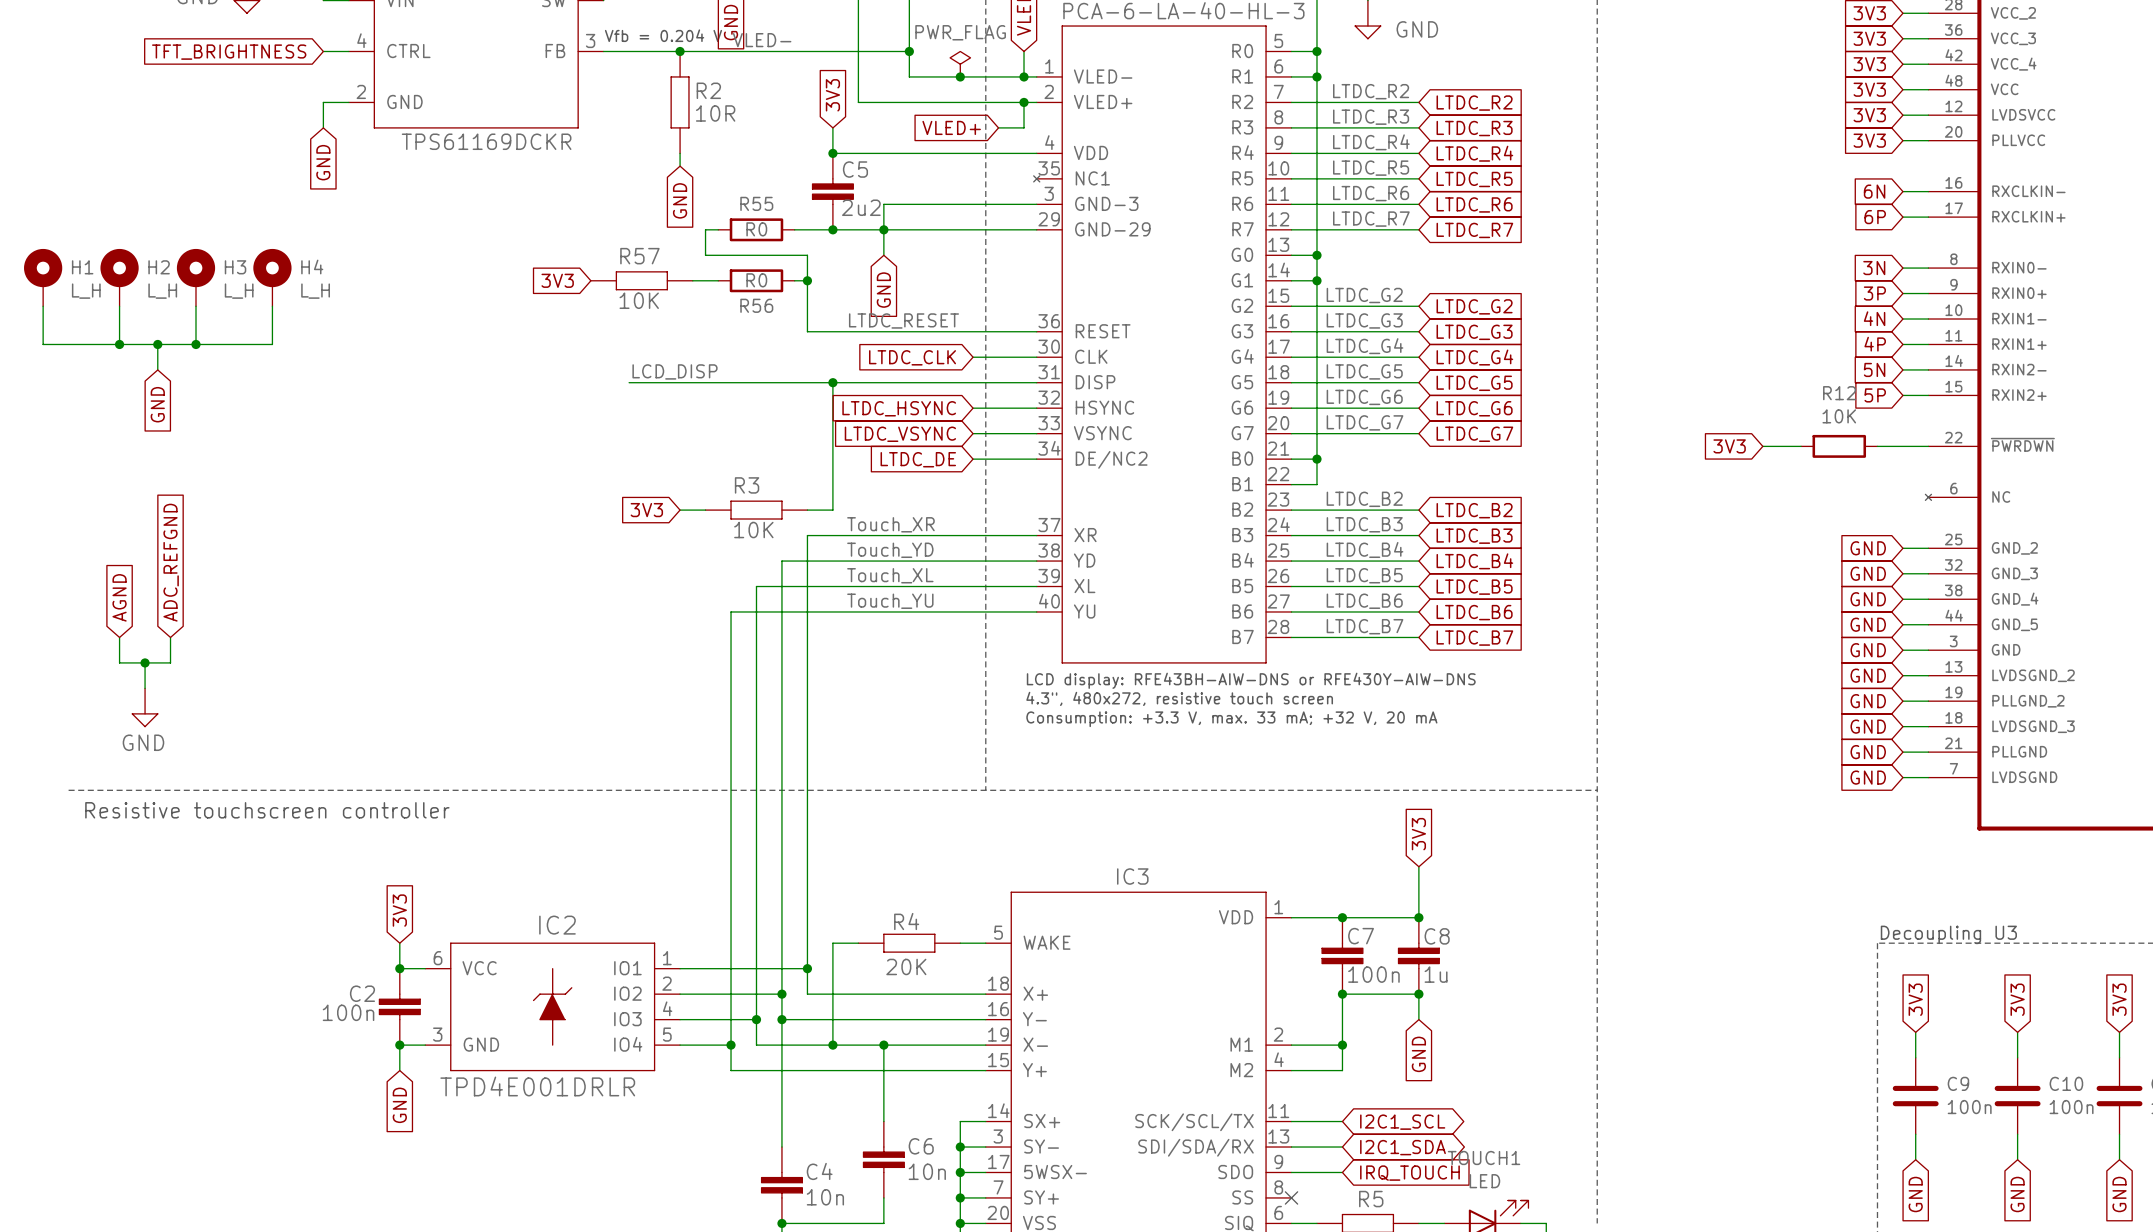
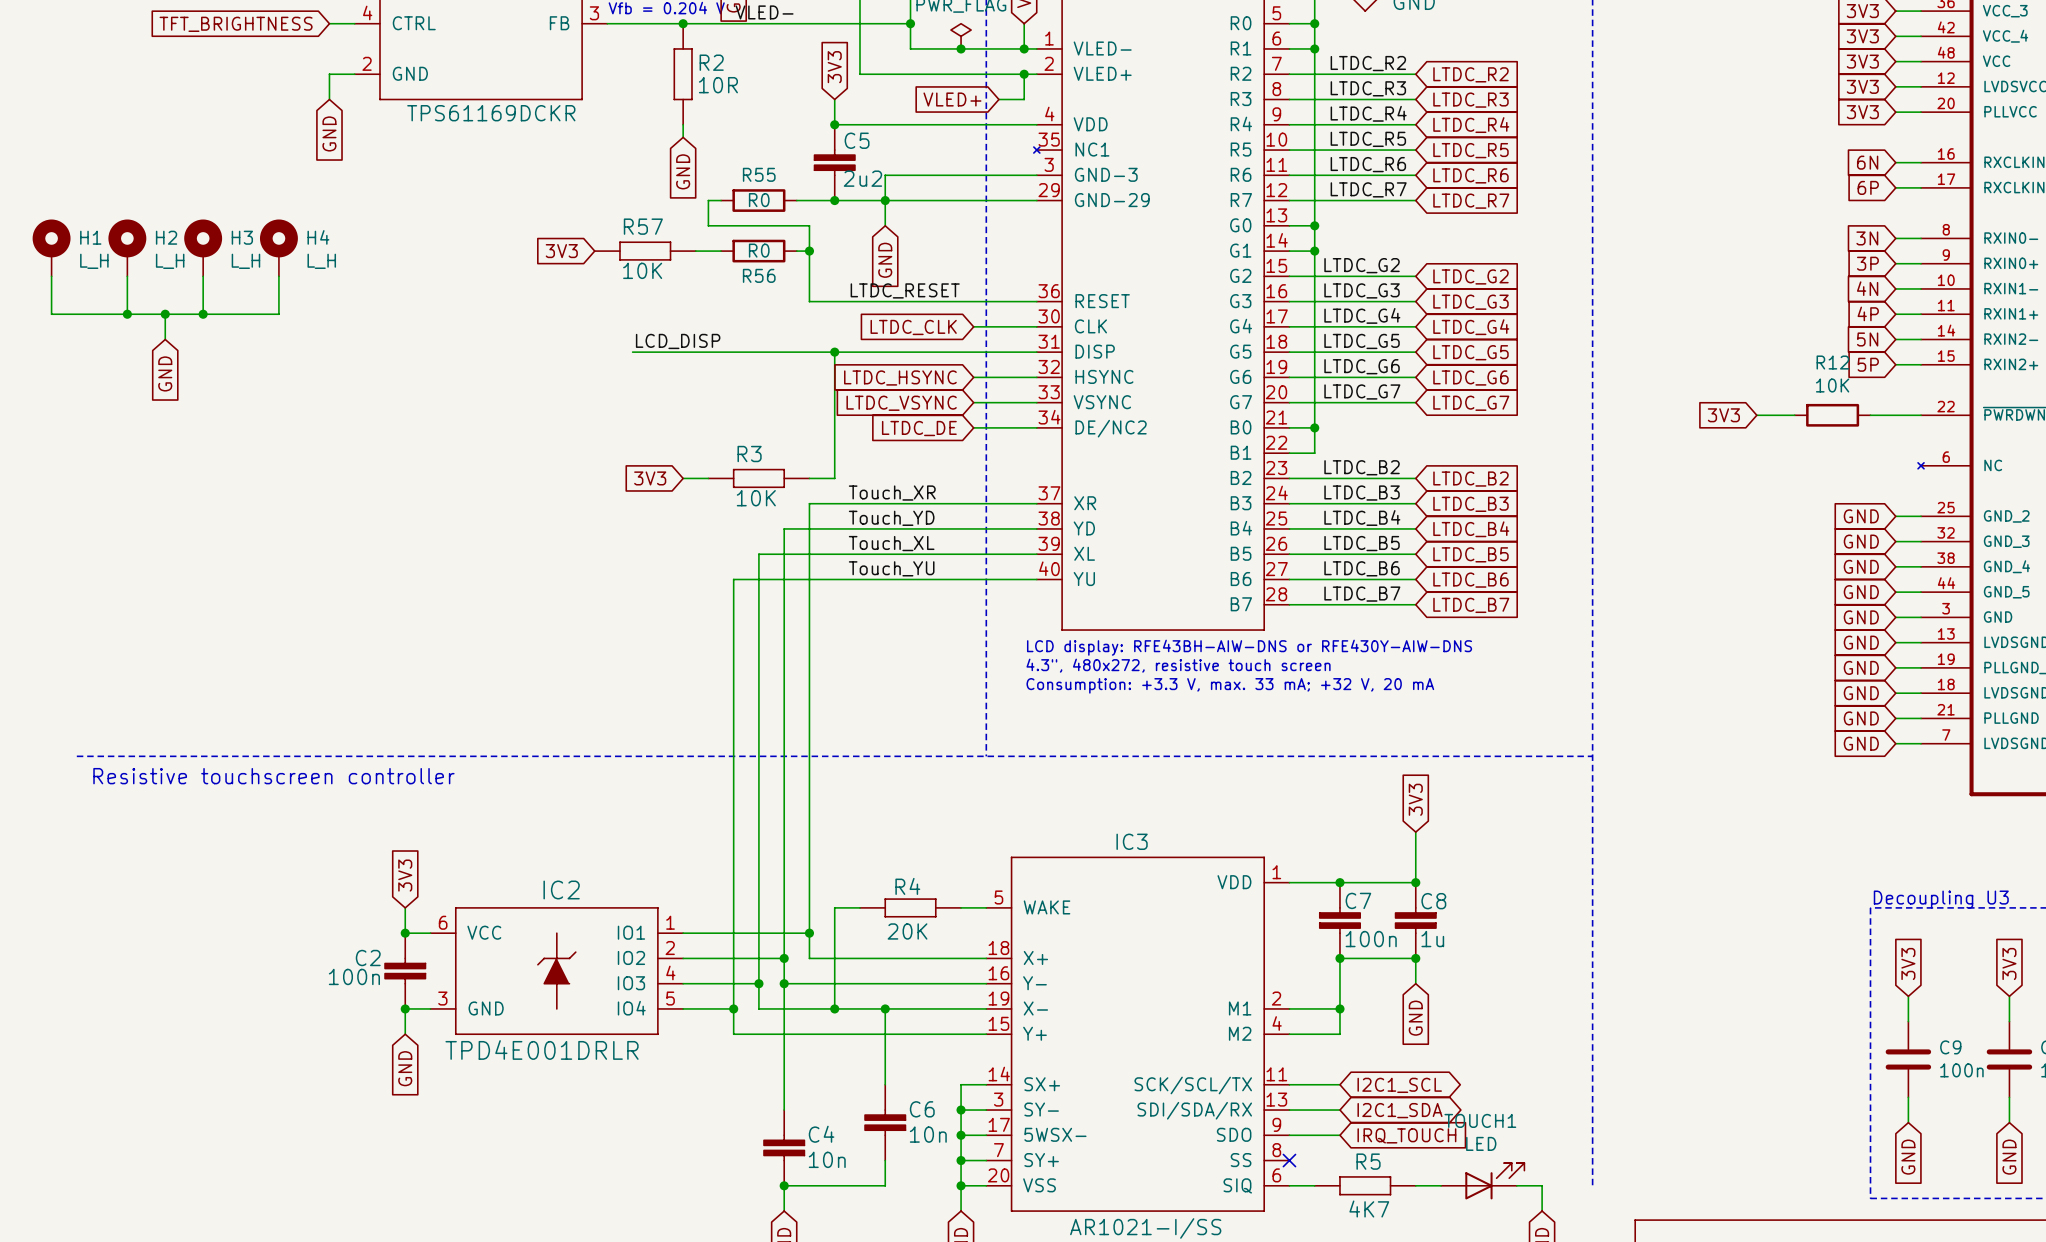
global label: ADC_REFGND (171, 562) -> none
global label: AGND (119, 597) -> none
wire: (119, 637) (119, 662) (170, 662) (170, 637) -> none
wire: (145, 662) (145, 688) -> none
junction: (145, 662) -> none
power symbol: GND (145, 707) -> none

